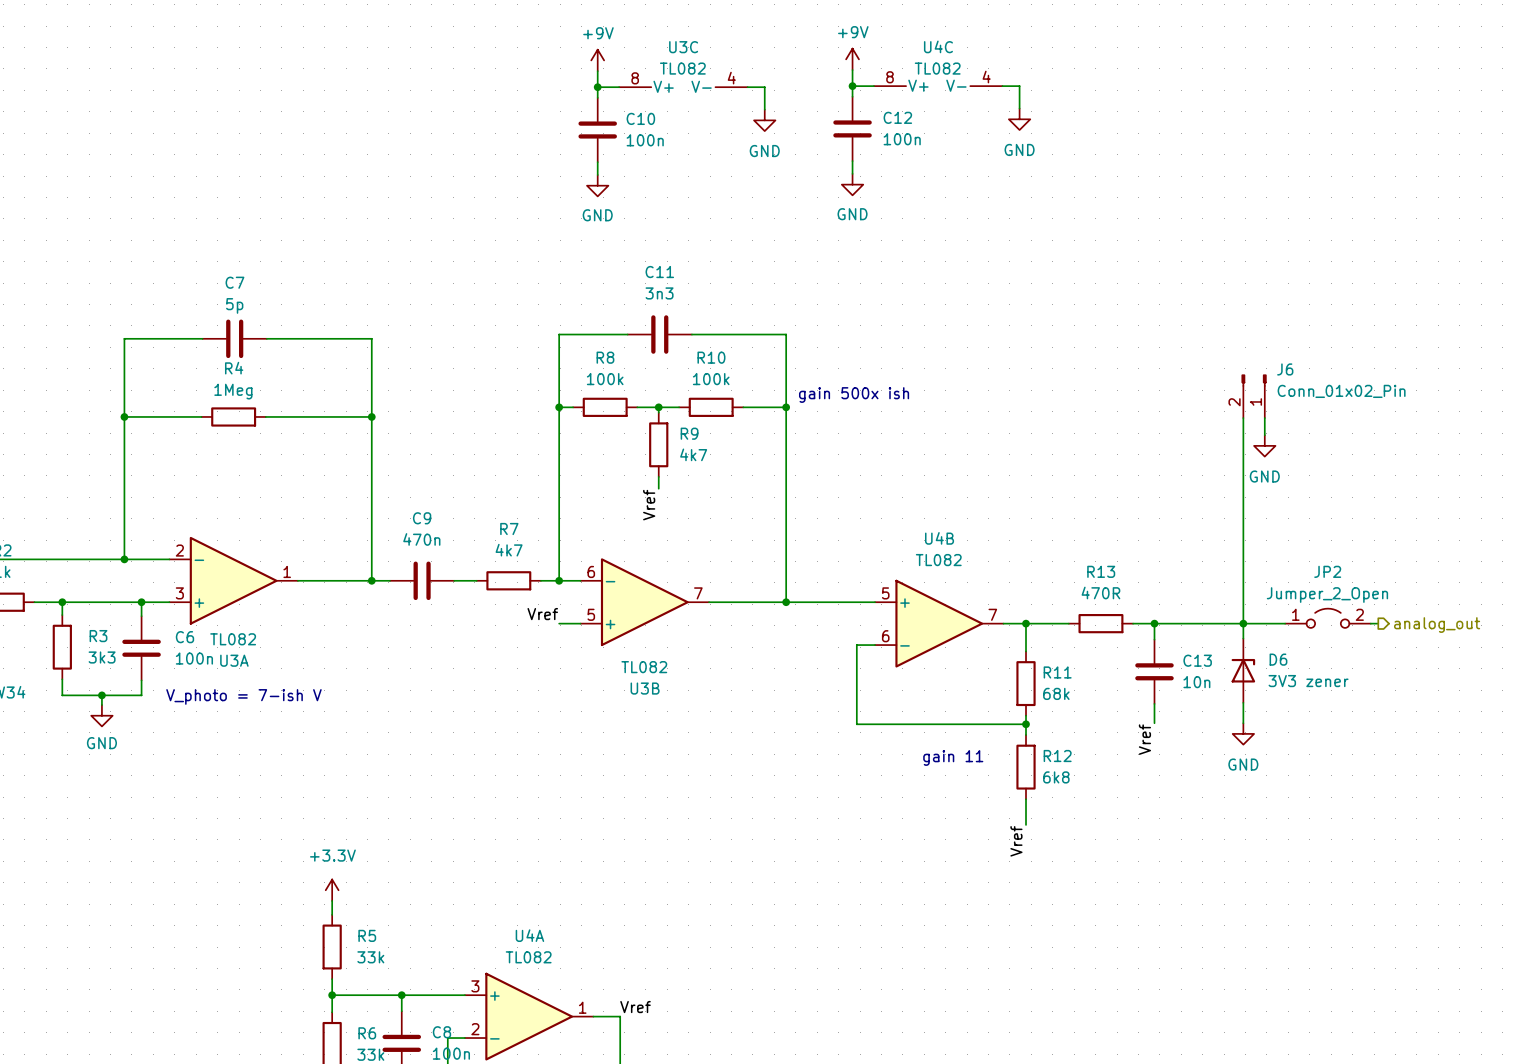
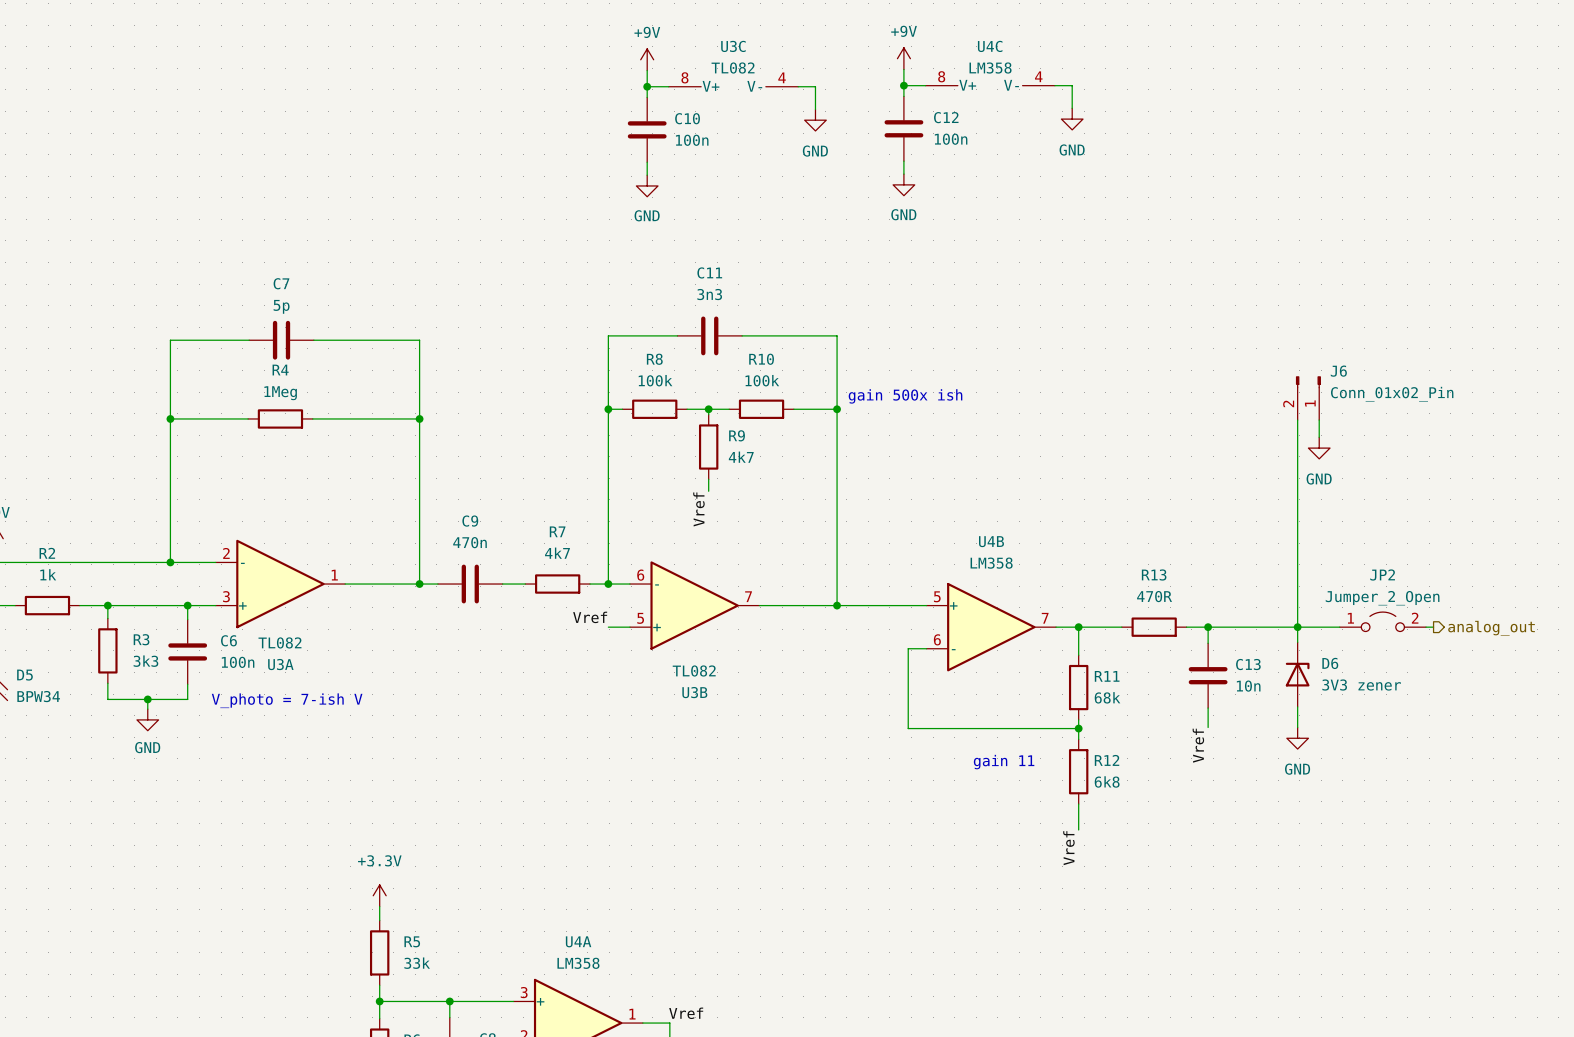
U4C value: TL082 (937, 68) -> LM358 (990, 68)
U4B value: TL082 (938, 560) -> LM358 (991, 563)
U4A value: TL082 (528, 957) -> LM358 (578, 963)

